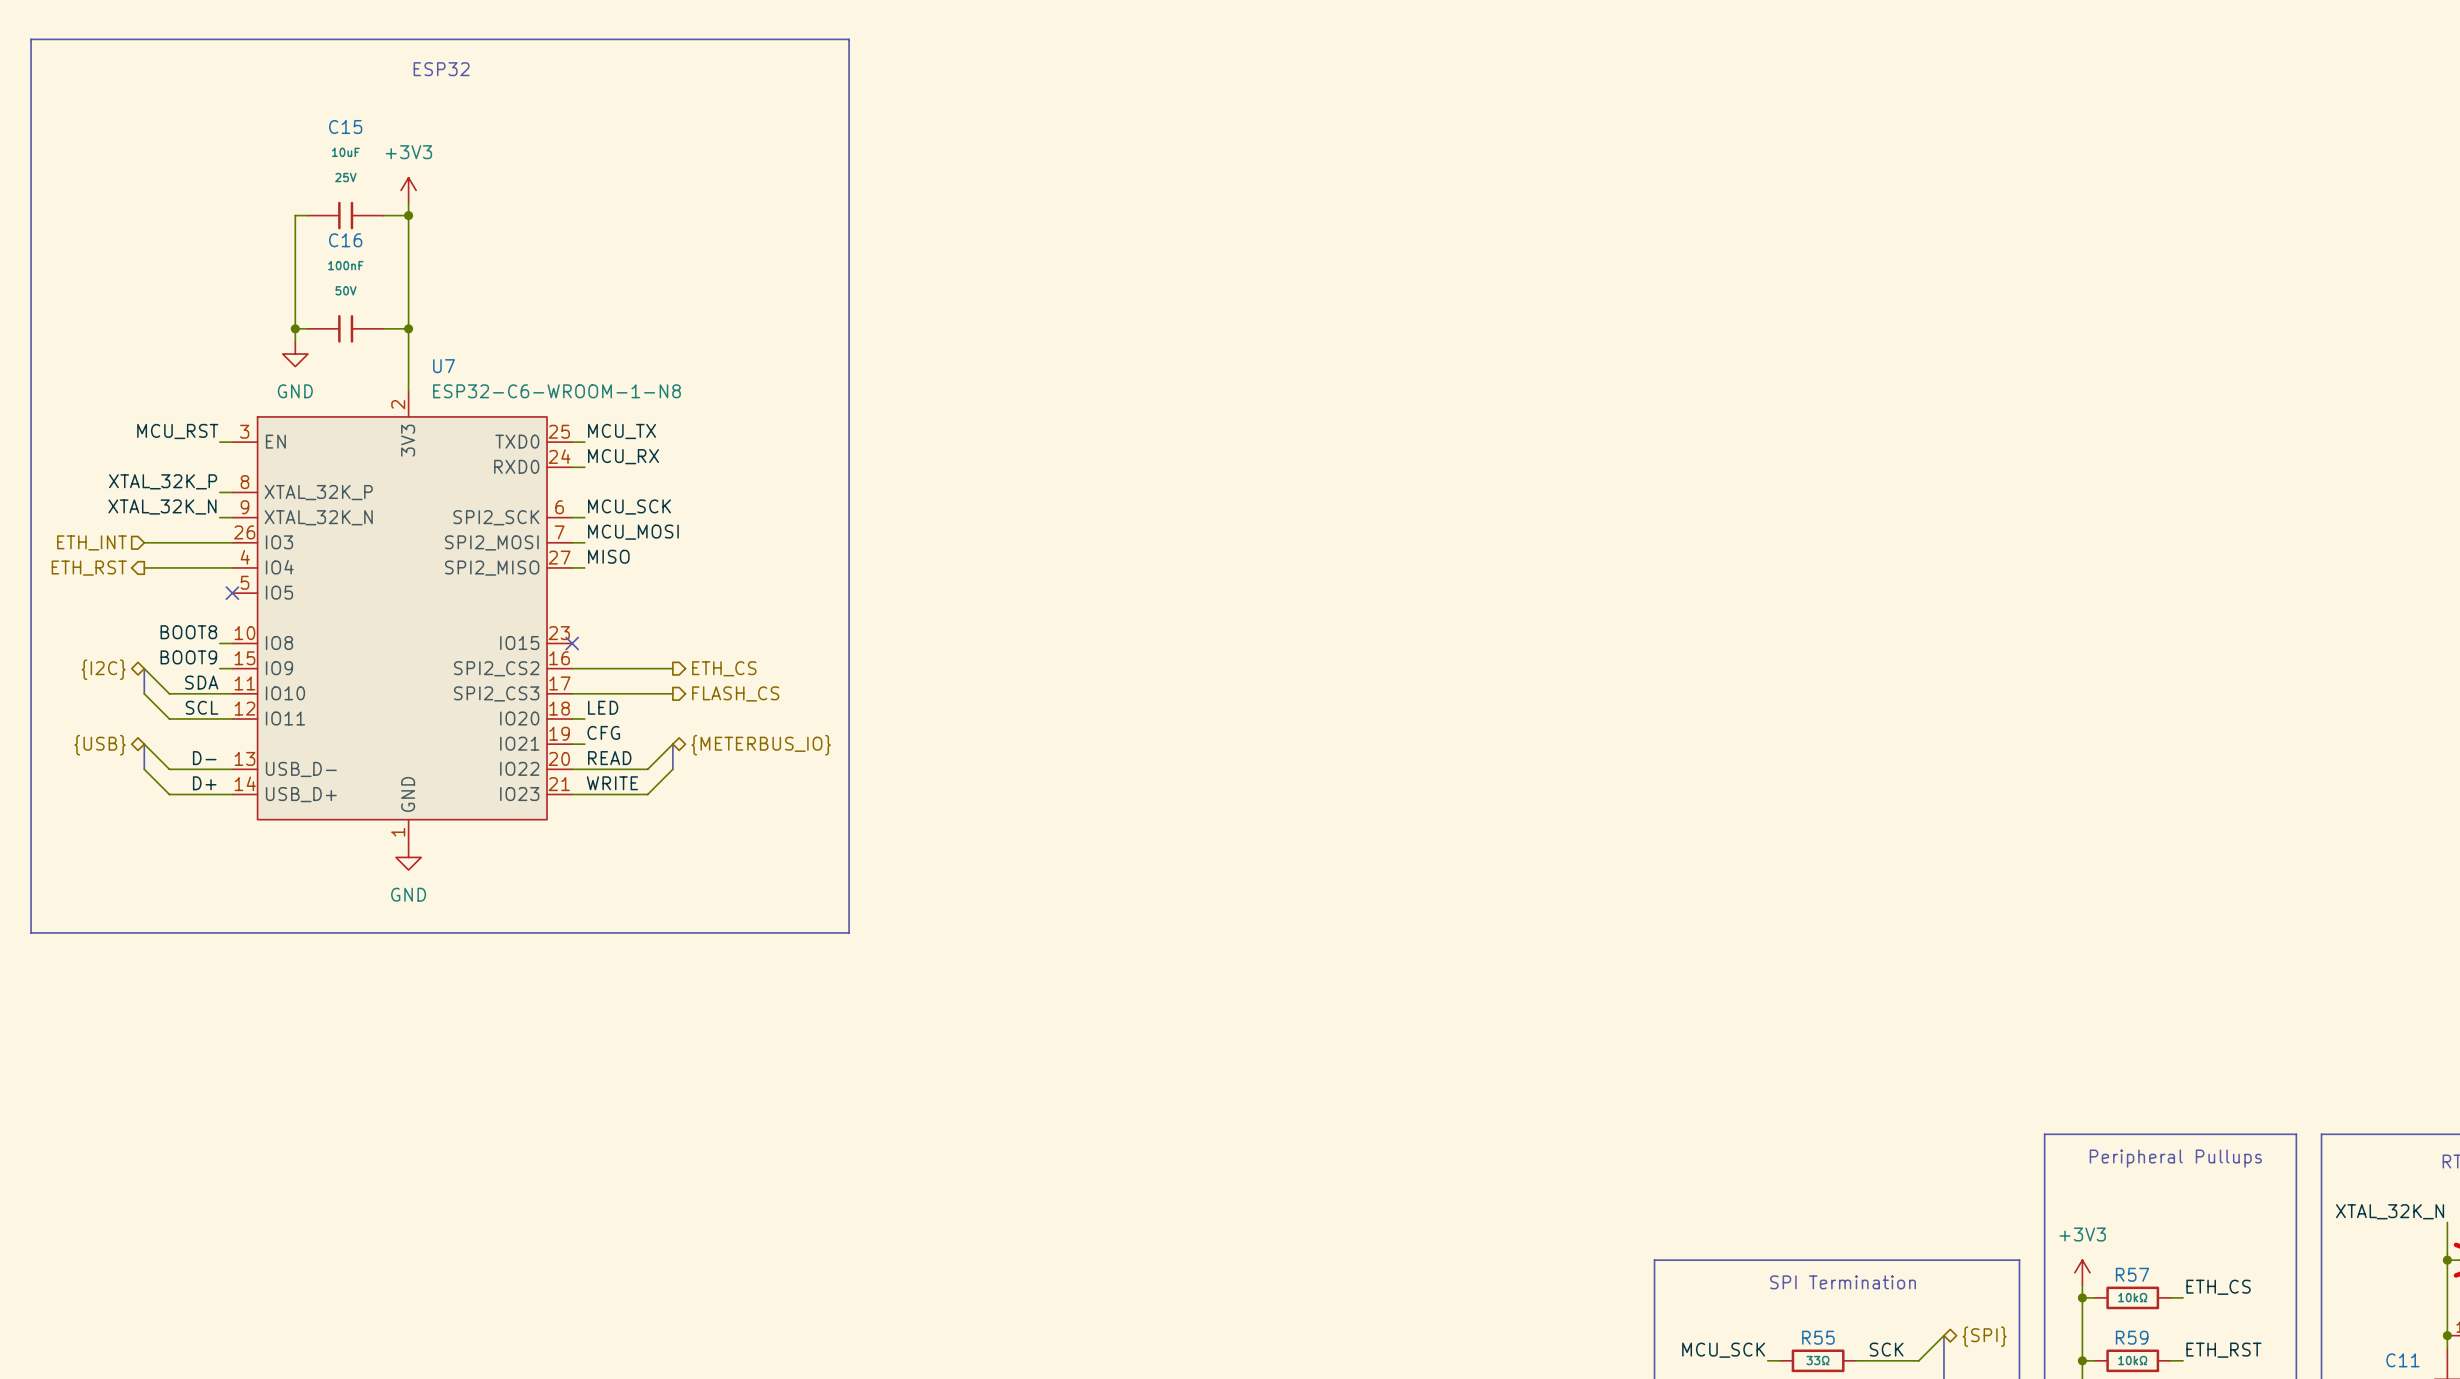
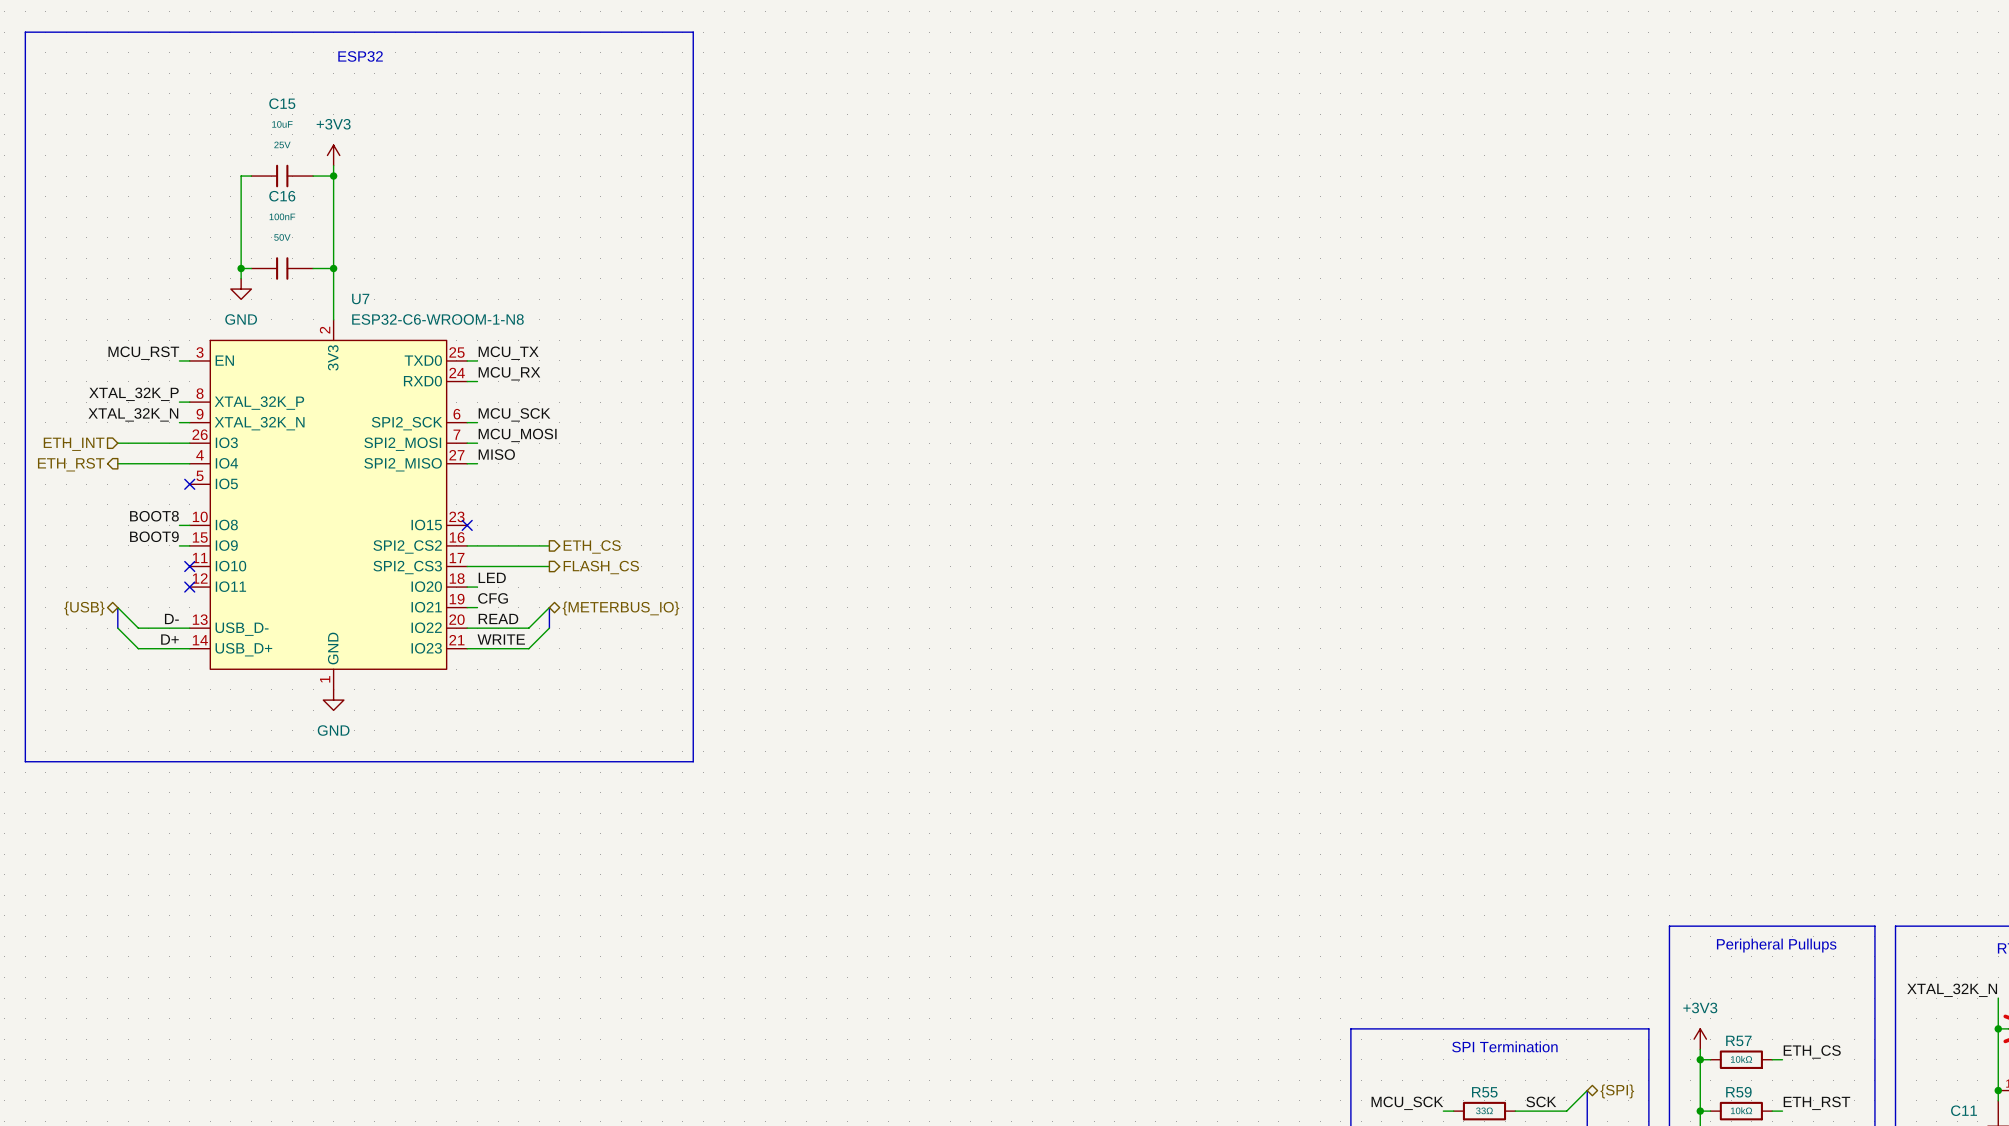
wire: (144, 668) (169, 693) (232, 693) -> none
bus: (144, 668) (144, 693) -> none
hierarchical label: {I2C} (103, 669) -> none
label: SDA (201, 682) -> none
wire: (144, 693) (169, 718) (232, 718) -> none
no-connect mark: none -> (189, 566)
label: SCL (202, 707) -> none
no-connect mark: none -> (189, 587)

